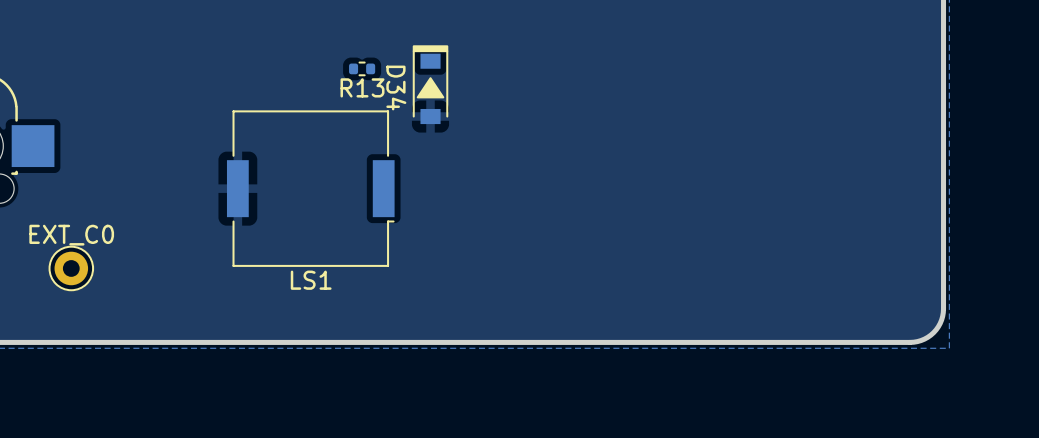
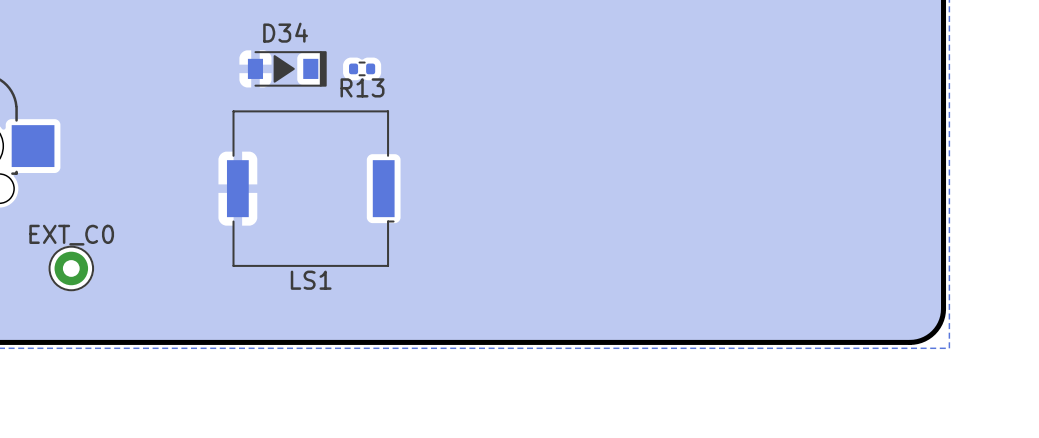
D34 rotation: 0° (430, 84) -> 90° clockwise (287, 68)
D34 position: (430, 84) -> (287, 68)

